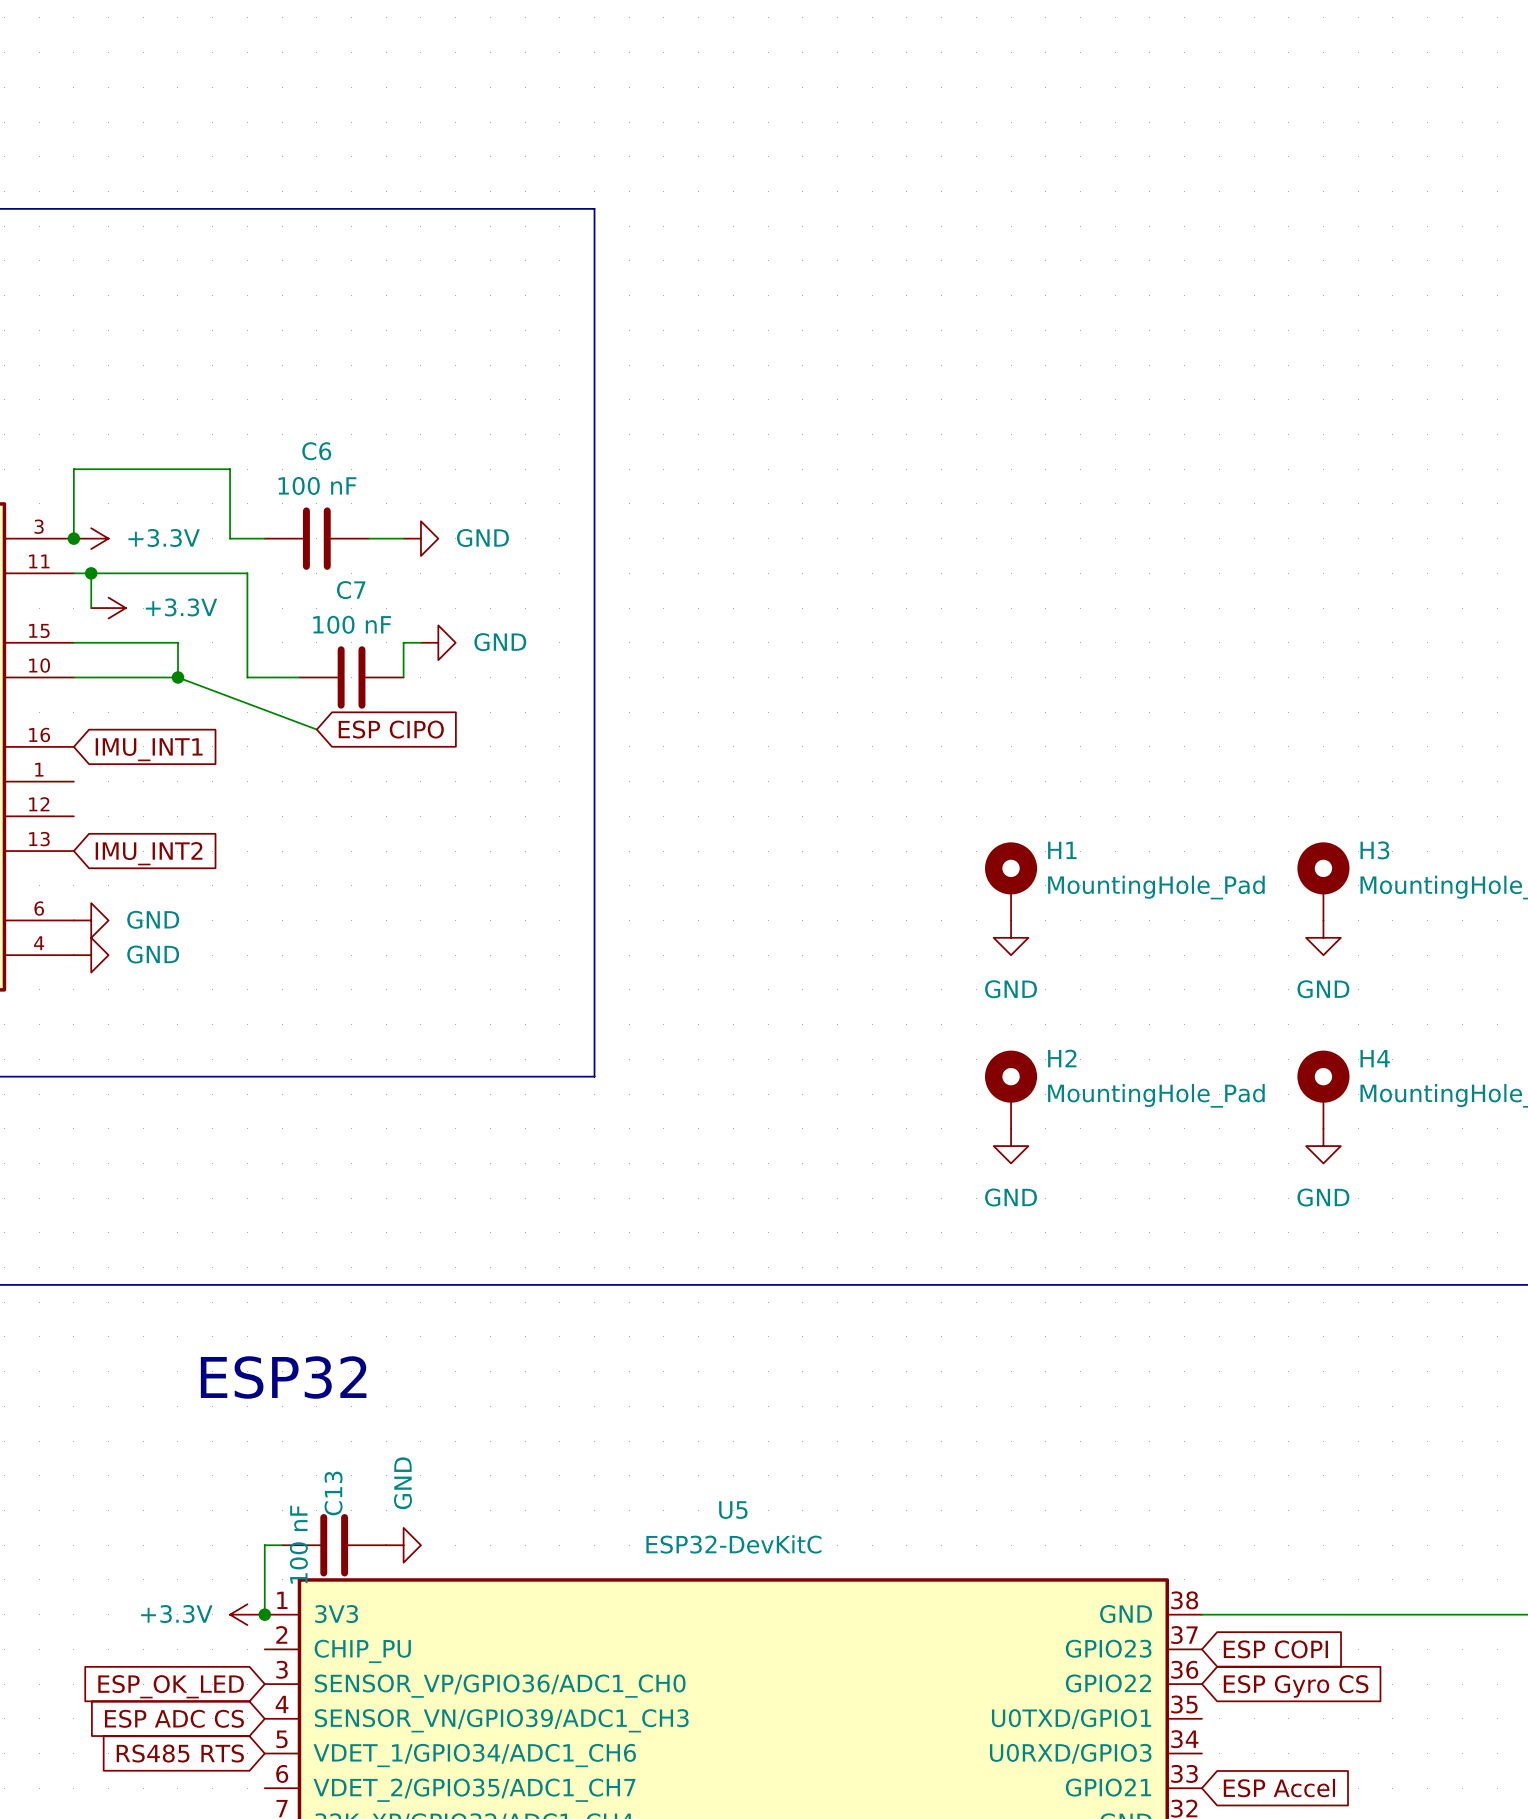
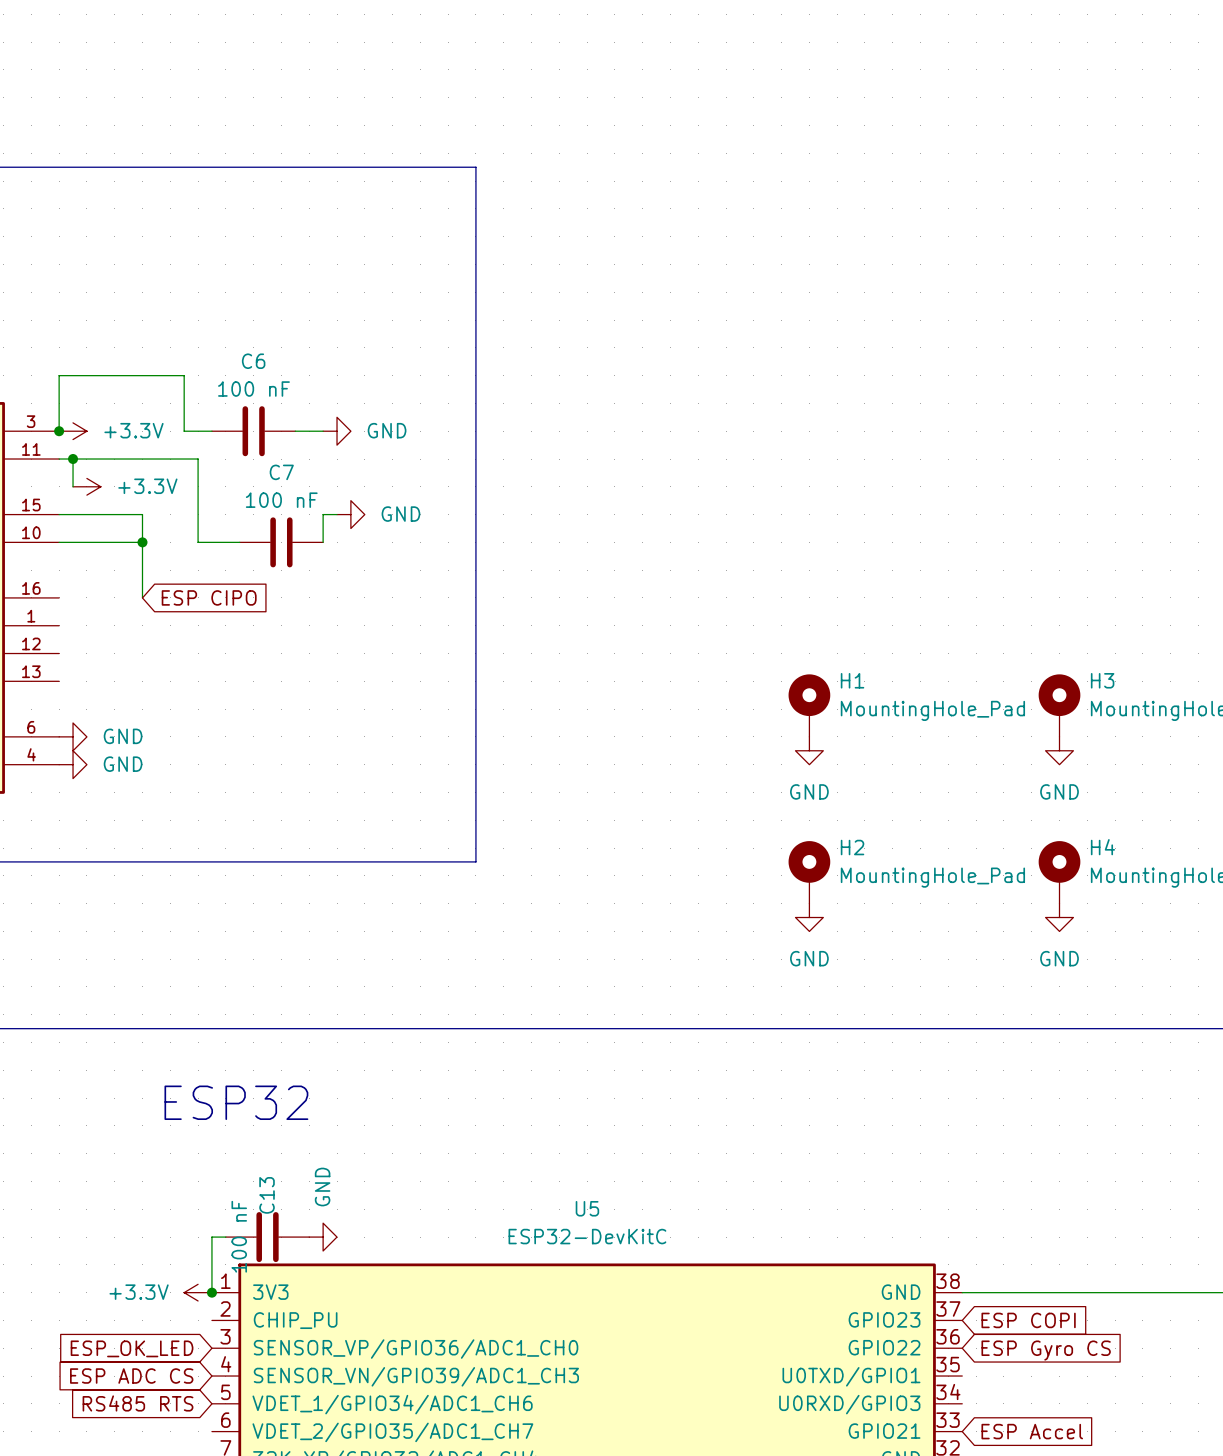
wire: (177, 677) (316, 729) -> (142, 542) (142, 597)
global label position: ESP CIPO (391, 729) -> ESP CIPO (209, 597)
global label: IMU_INT1 (149, 749) -> none
global label: IMU_INT2 (149, 853) -> none

